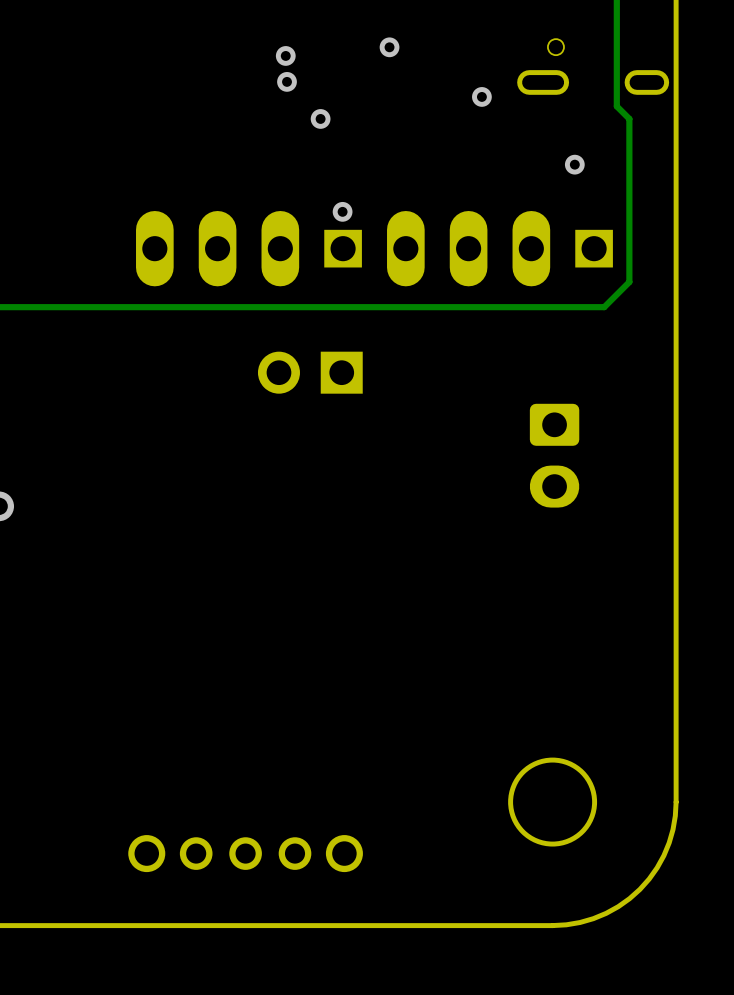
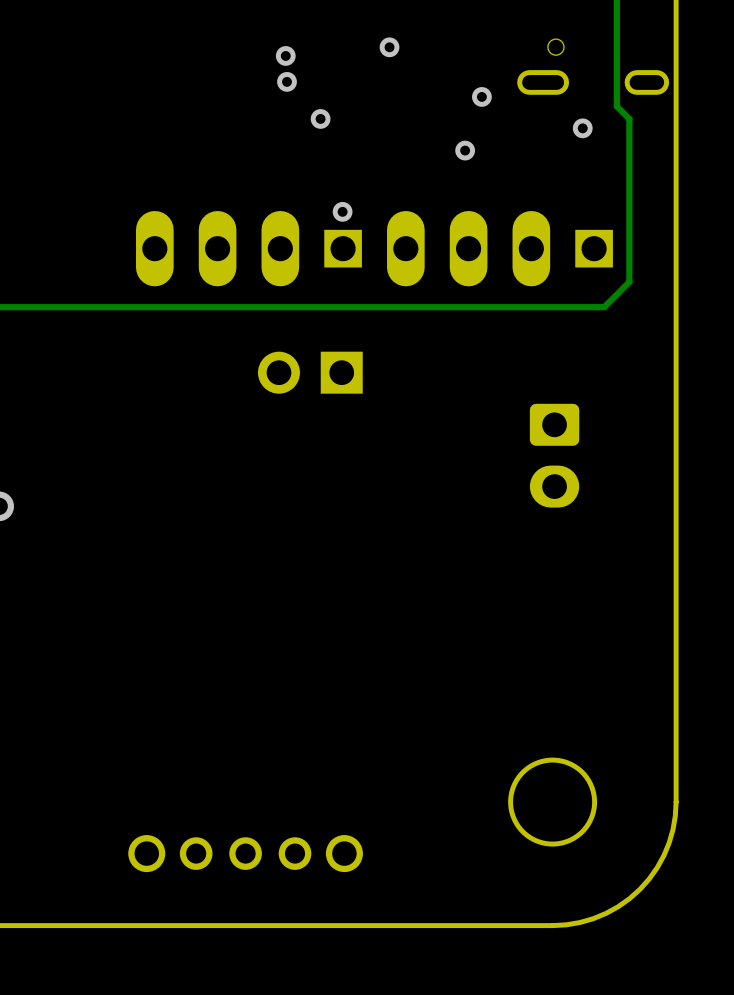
via: none -> (465, 150)
via position: (574, 164) -> (582, 128)

